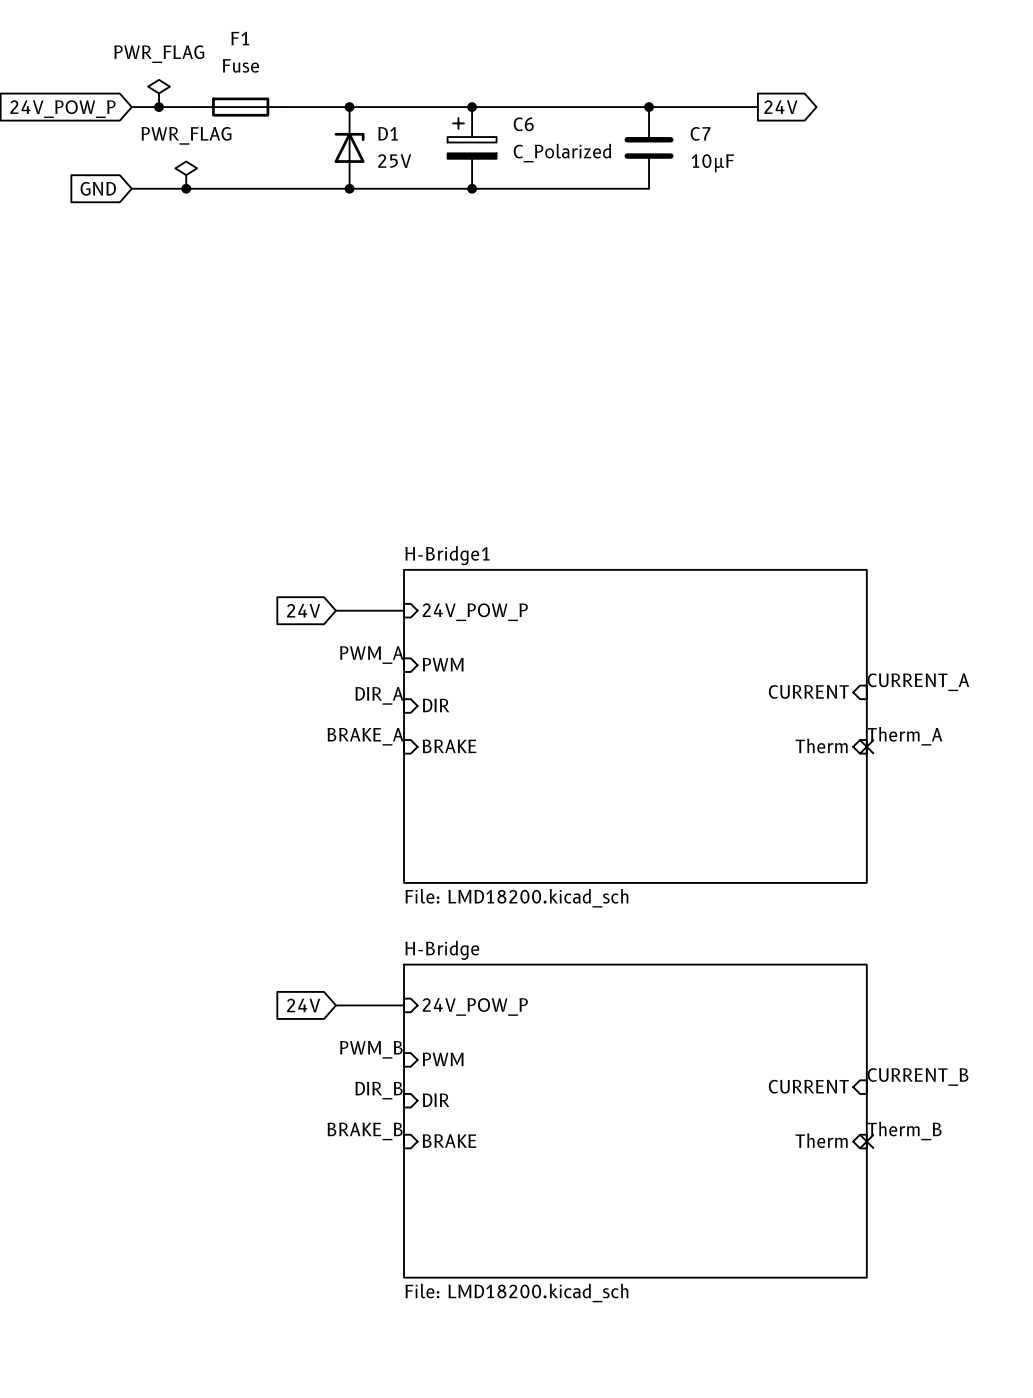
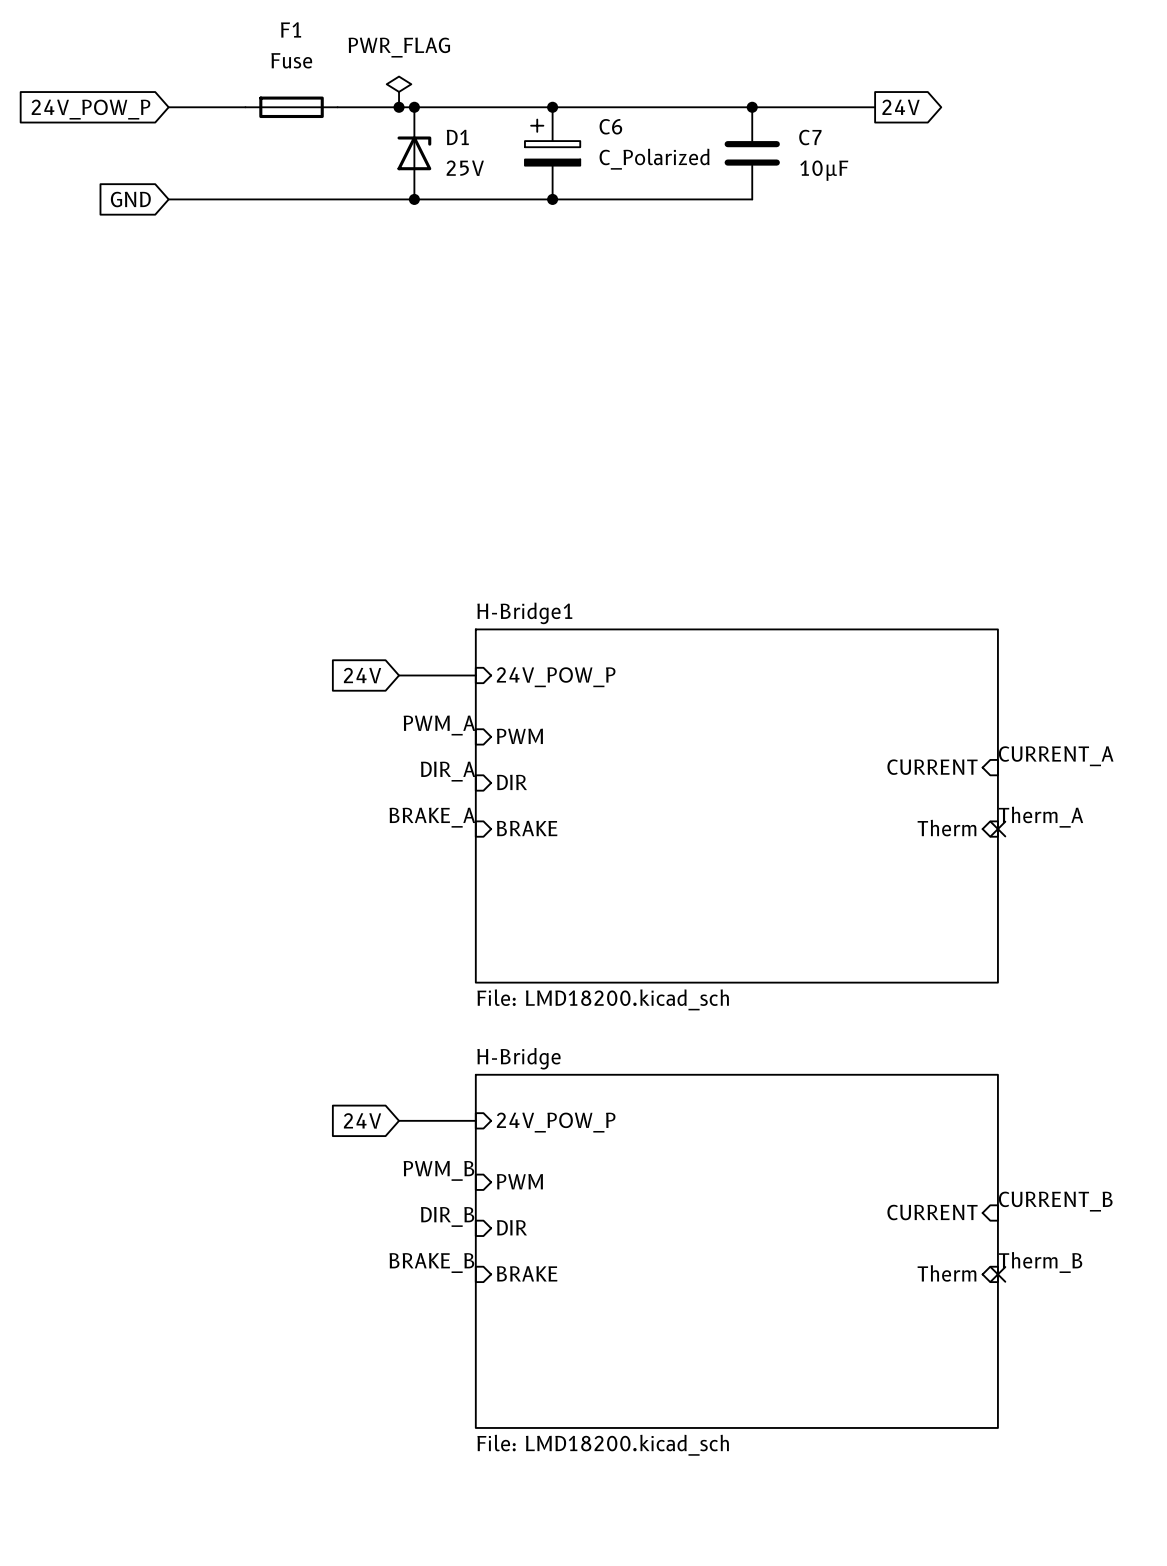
power symbol: PWR_FLAG (159, 93) -> none
power symbol: none -> PWR_FLAG (399, 91)
junction: (159, 107) -> none
junction: none -> (399, 107)
power symbol: PWR_FLAG (186, 175) -> none
junction: (186, 188) -> none

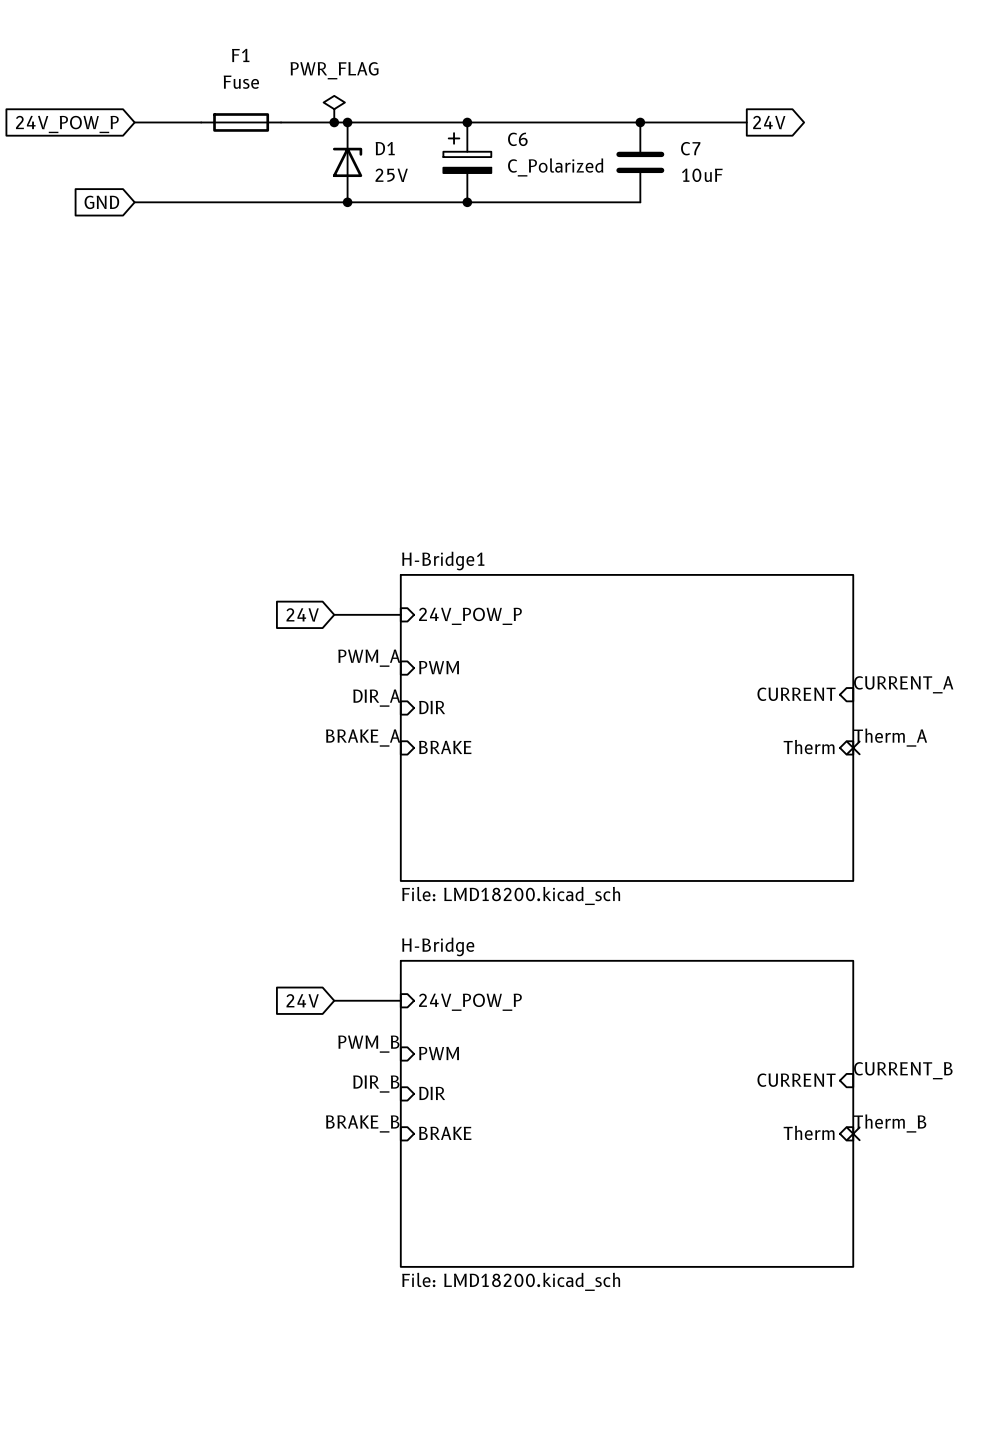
C7 value: 10µF (824, 170) -> 10uF (702, 175)

